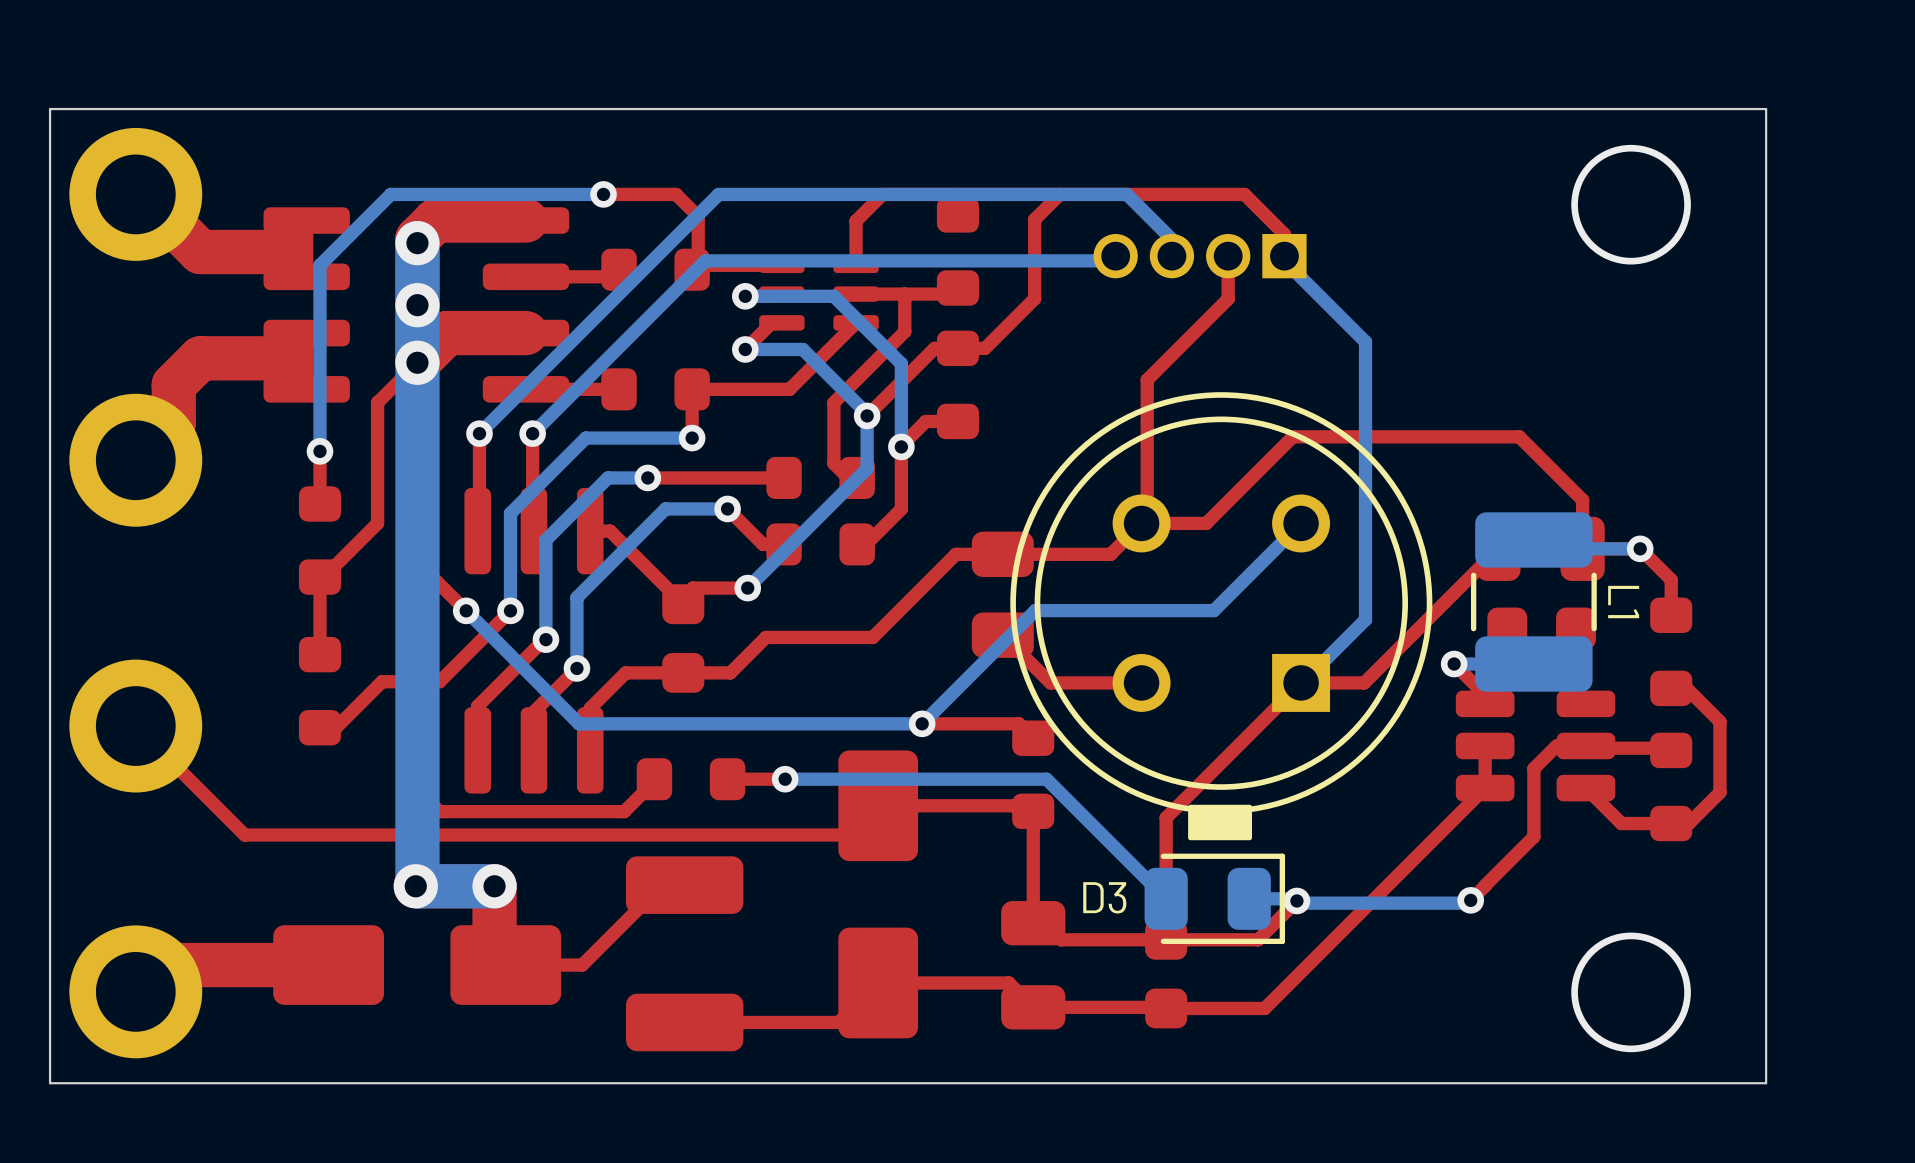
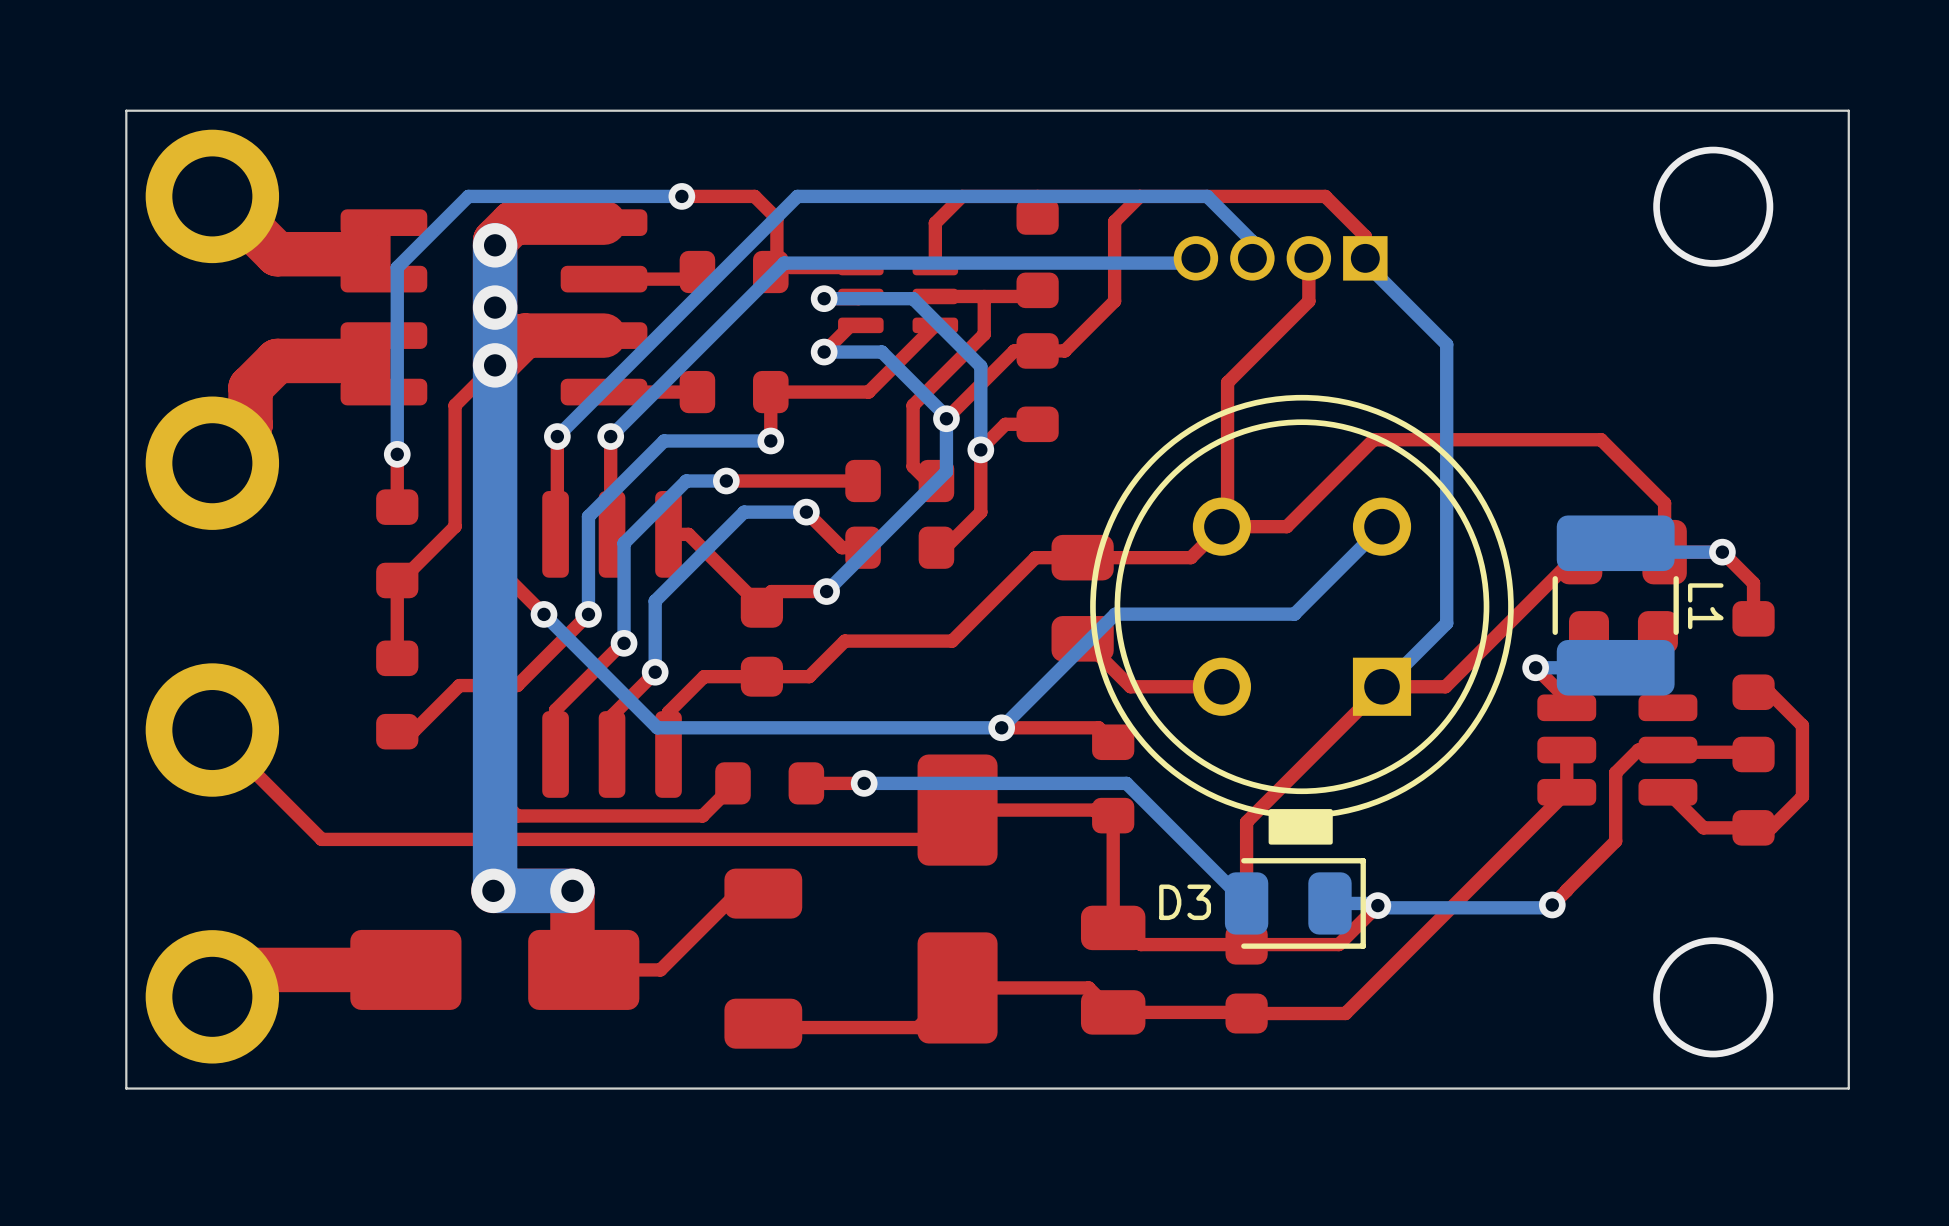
part footprint: [625, 856, 744, 1052] -> [724, 868, 803, 1049]

